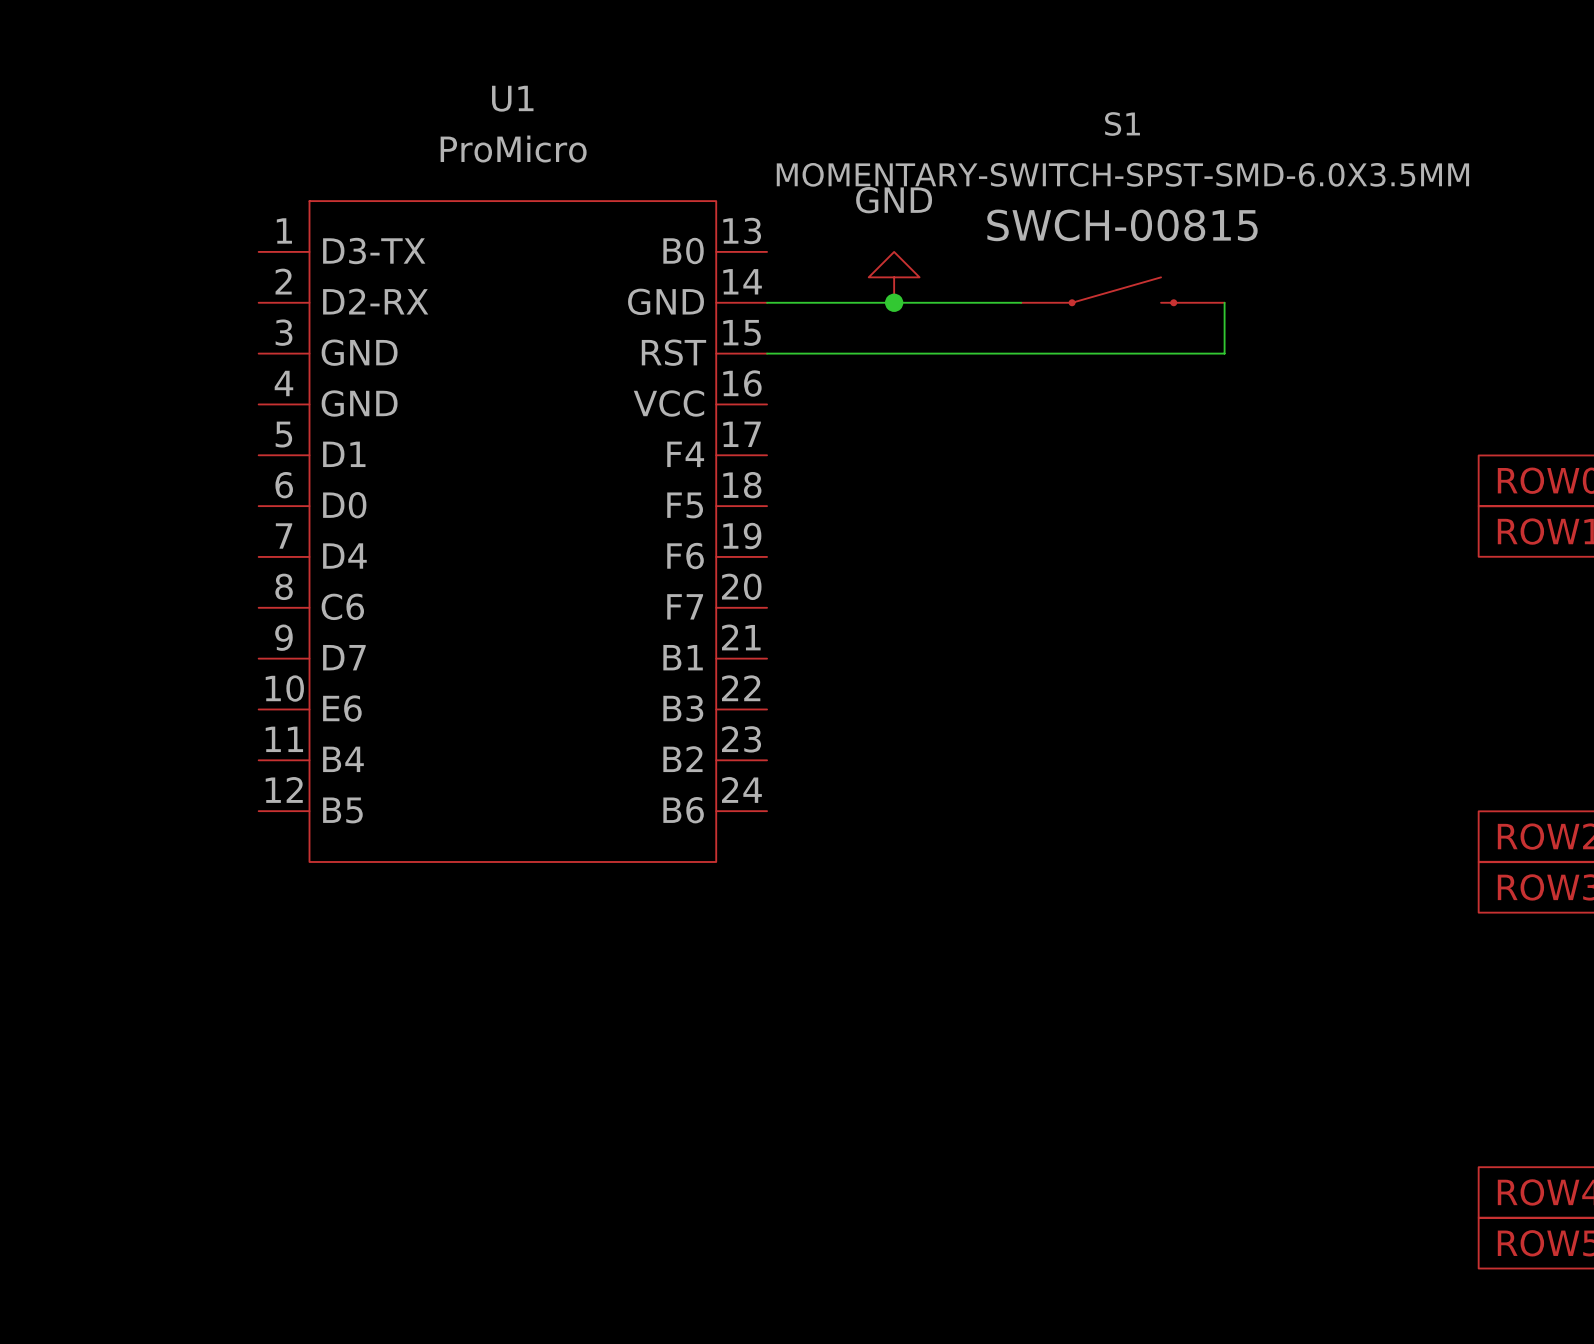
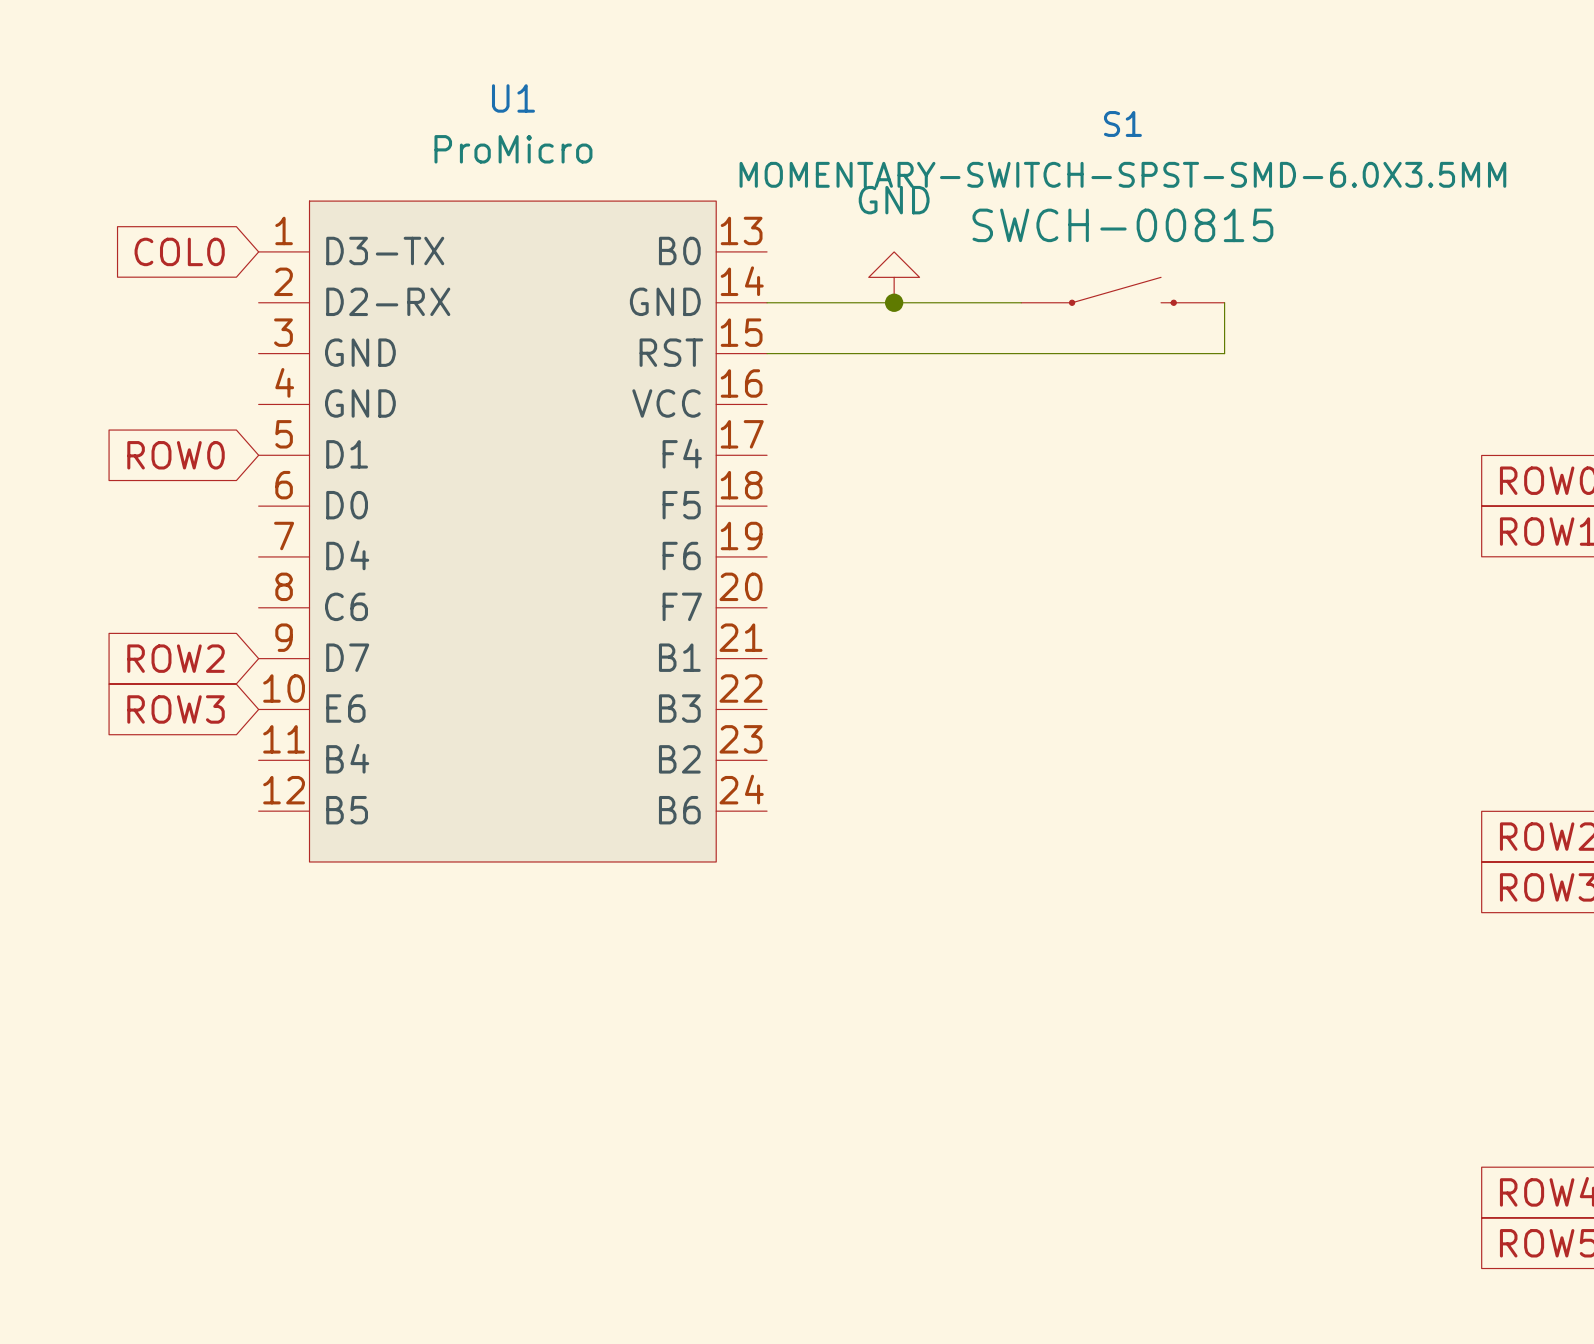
global label: none -> COL0 (179, 251)
global label: none -> ROW0 (176, 455)
global label: none -> ROW2 (176, 658)
global label: none -> ROW3 (176, 709)

